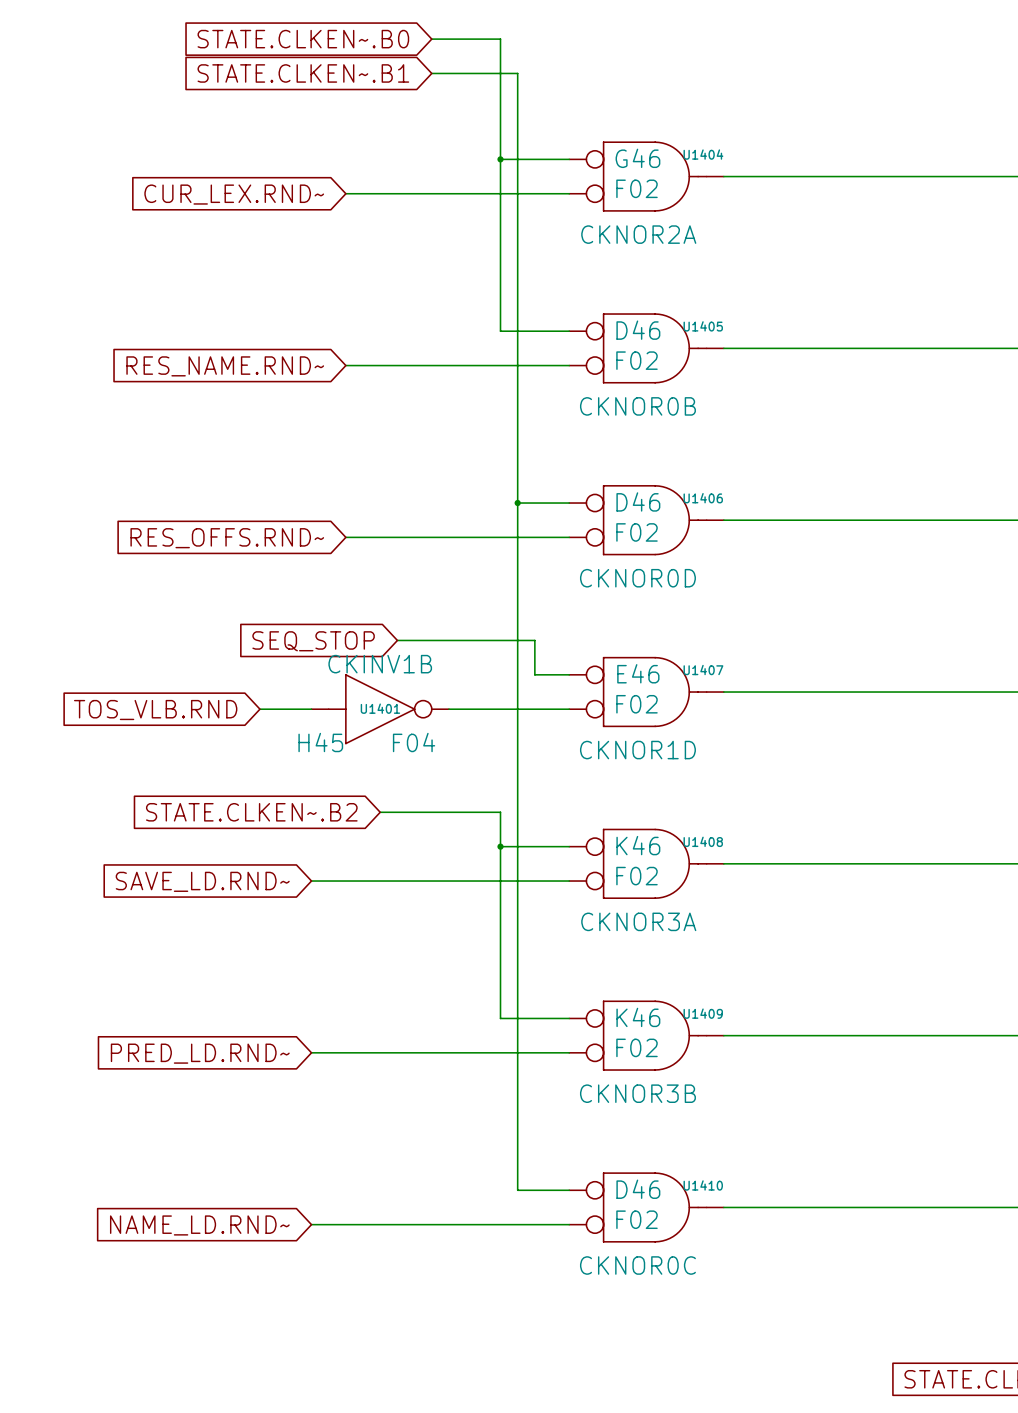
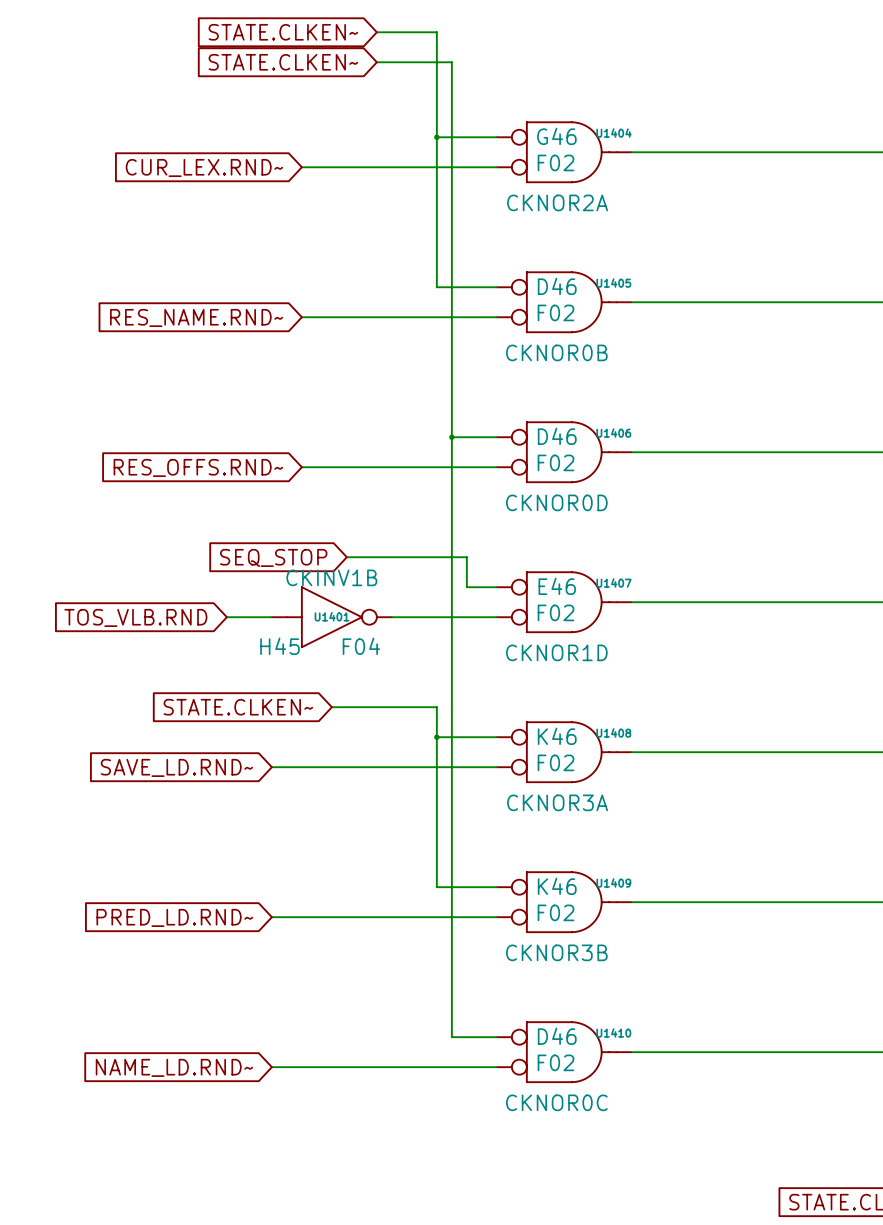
global label: STATE.CLKEN~.B0 (303, 39) -> STATE.CLKEN~ (283, 32)
global label: STATE.CLKEN~.B1 (303, 73) -> STATE.CLKEN~ (283, 62)
global label: STATE.CLKEN~.B2 (251, 812) -> STATE.CLKEN~ (238, 707)

